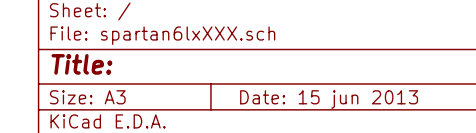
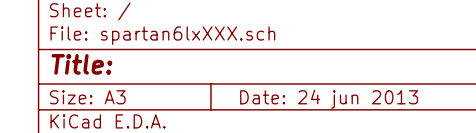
title block: Date: 15 jun 2013 (329, 99) -> Date: 24 jun 2013 (329, 99)

